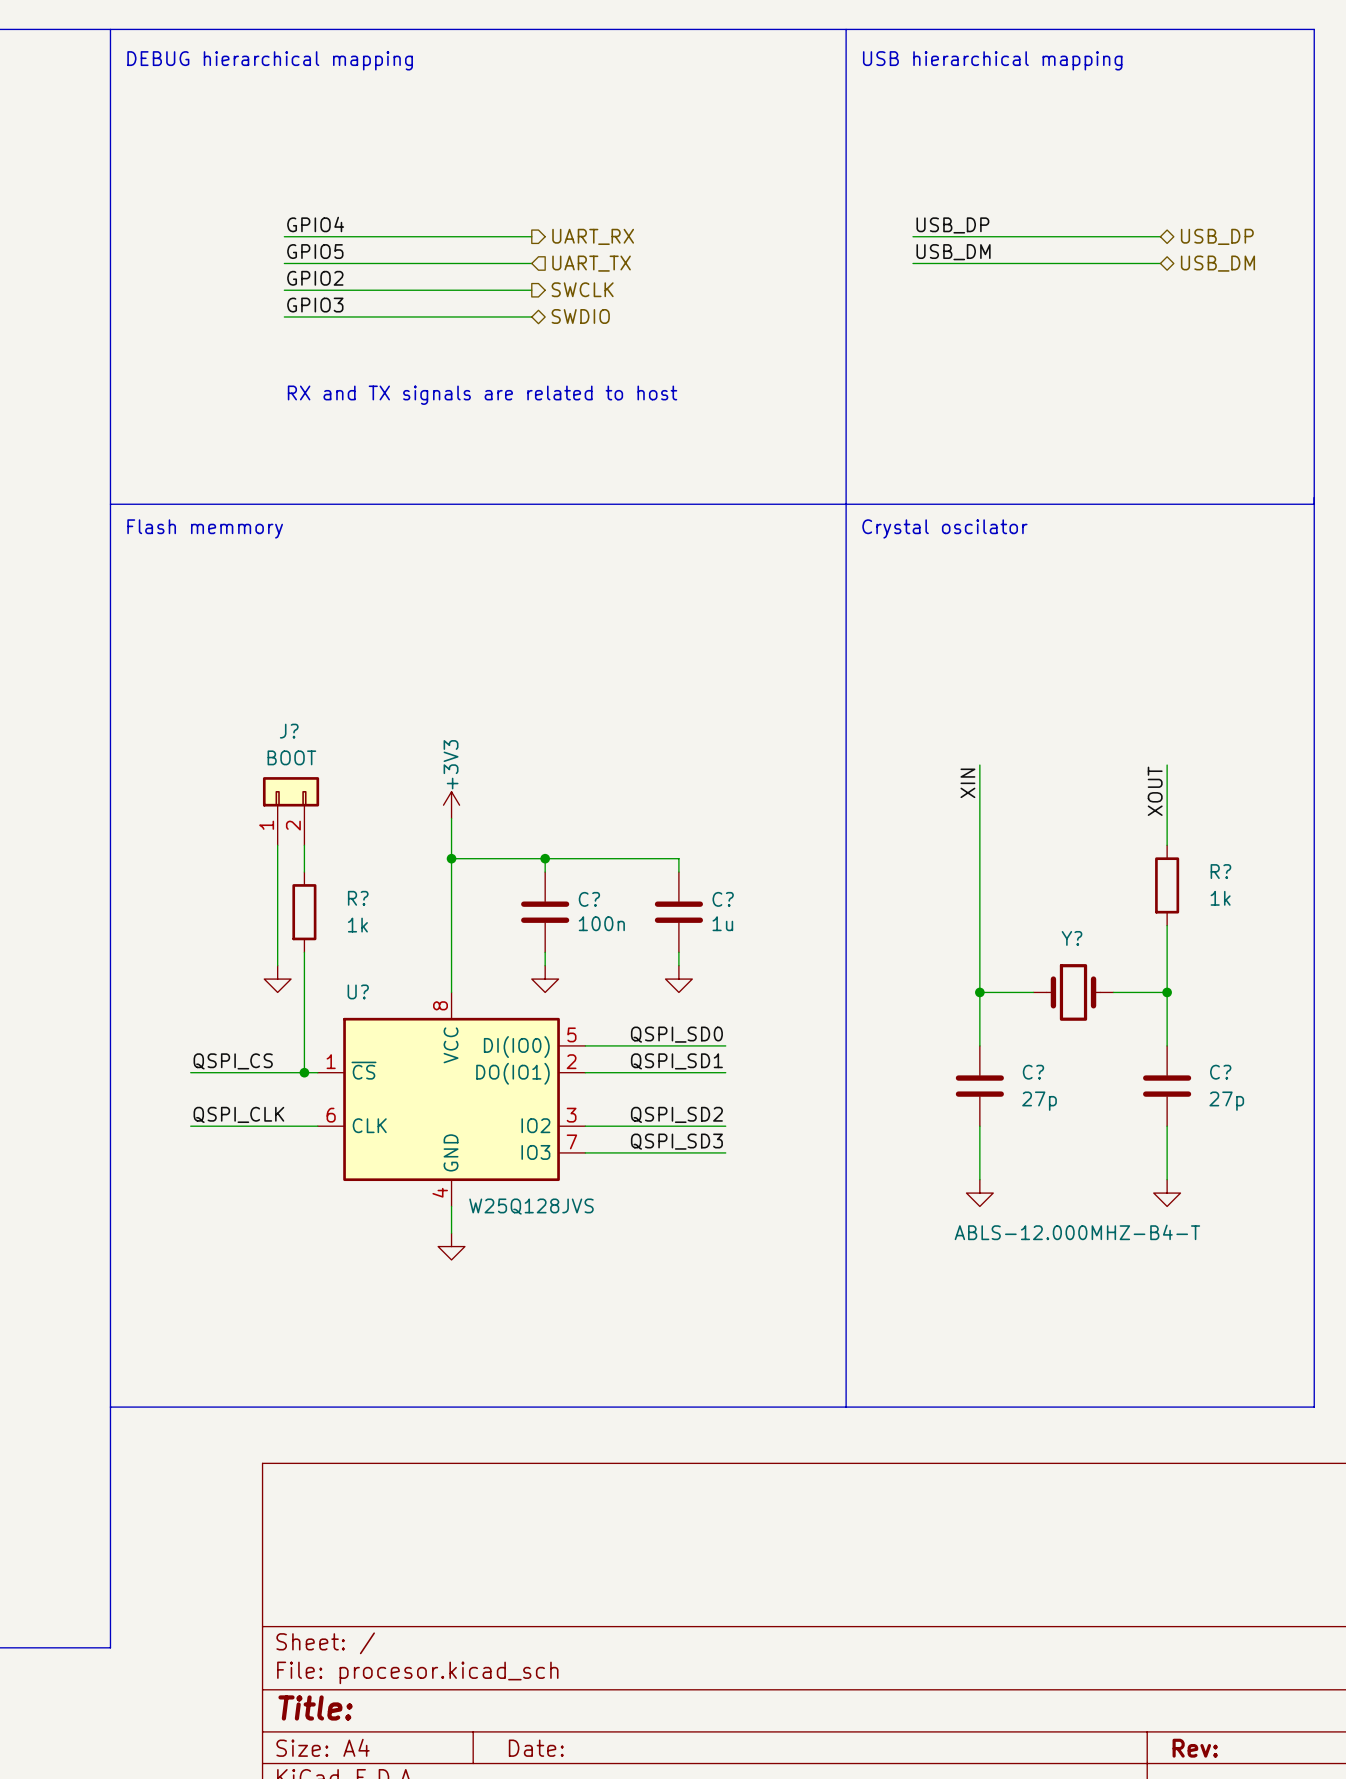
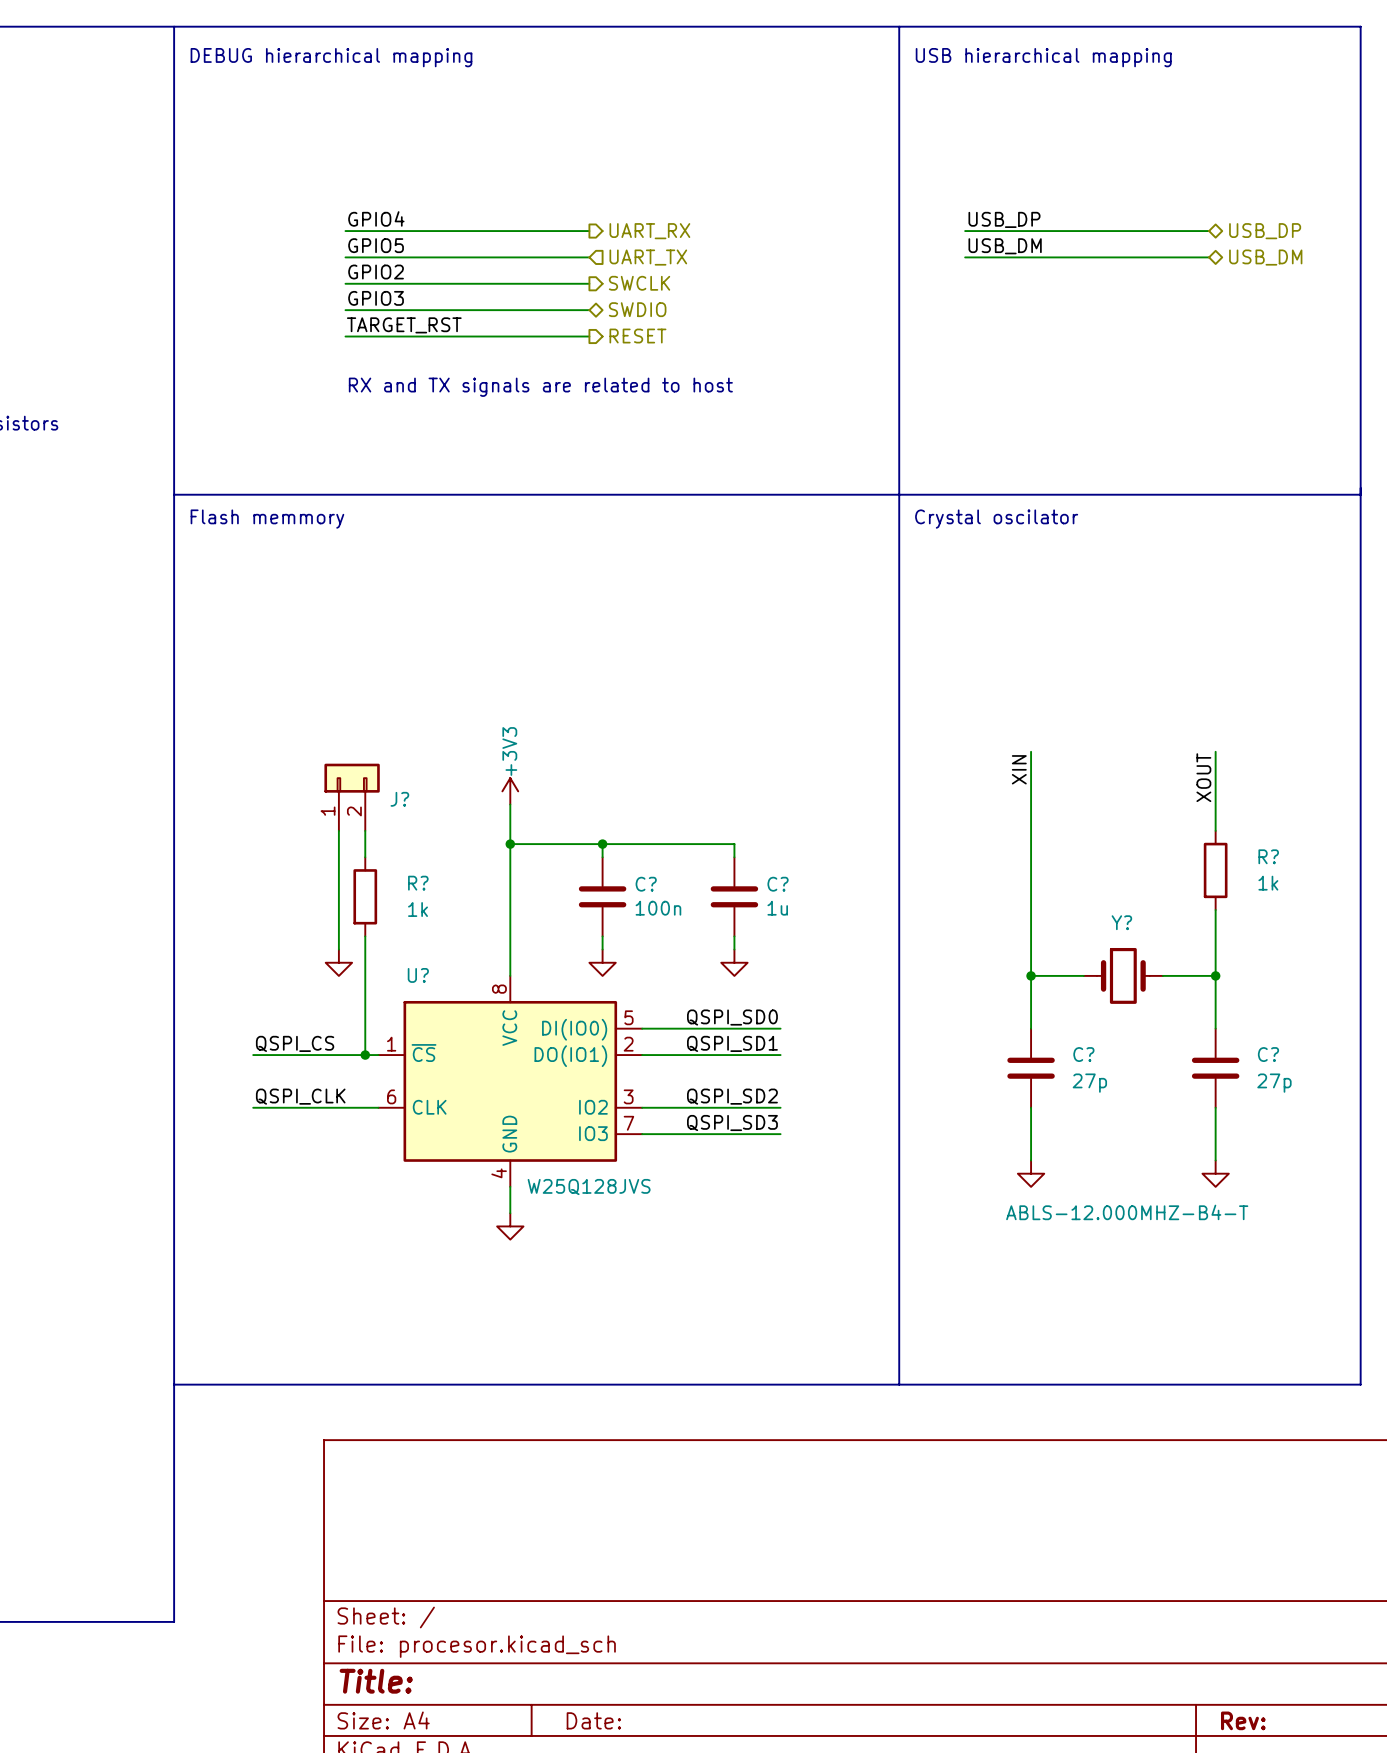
label: none -> TARGET_RST (404, 325)
wire: none -> (345, 336) (589, 336)
hierarchical label: none -> RESET (637, 336)
J? name position: J? (289, 731) -> J? (399, 799)
J? value: BOOT (291, 757) -> none

